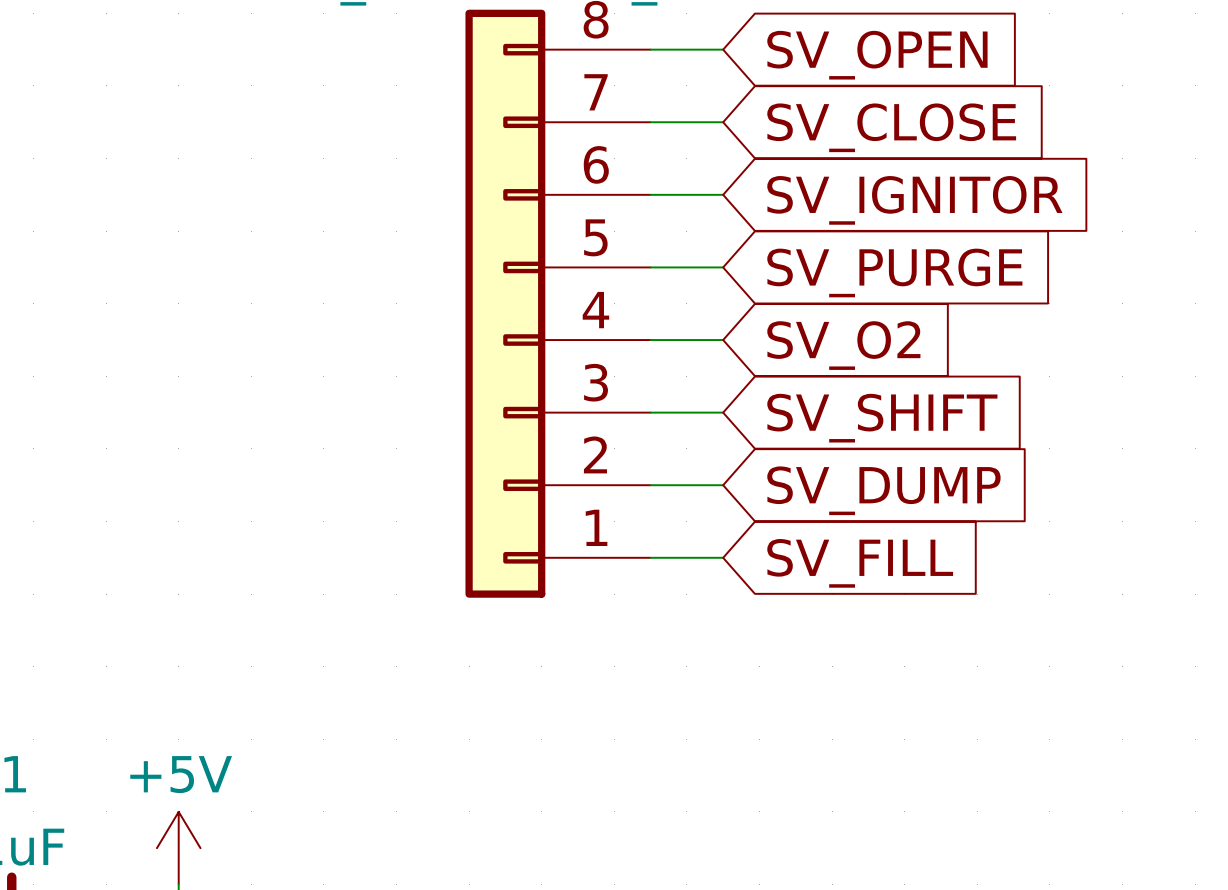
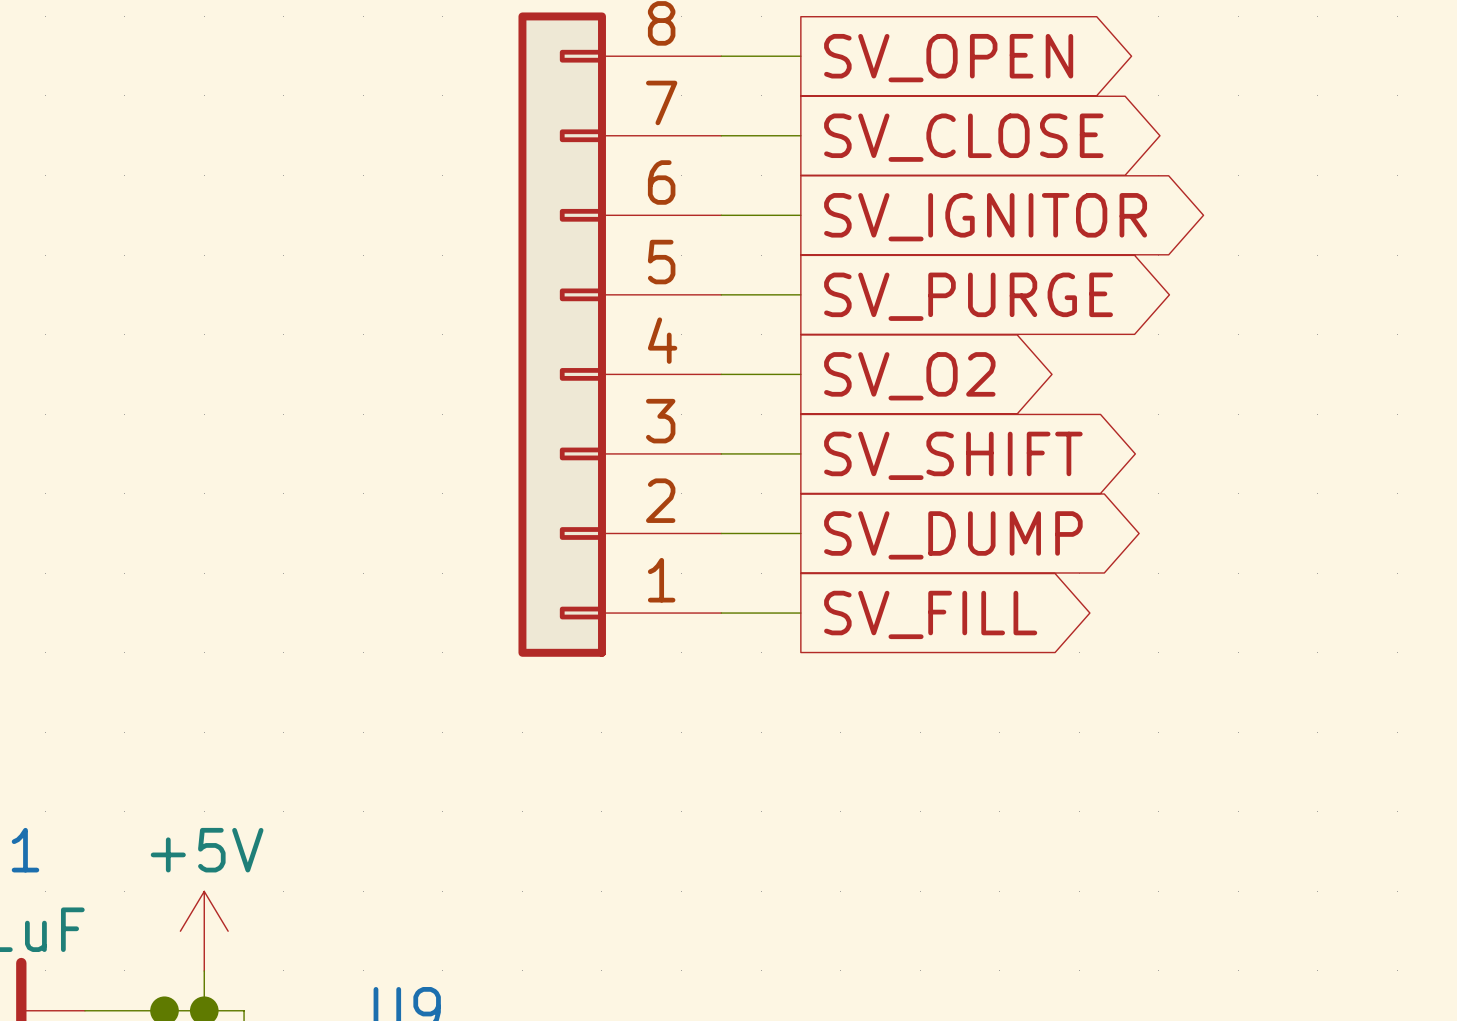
global label shape: input (877, 55) -> output (948, 58)
global label shape: input (891, 127) -> output (963, 137)
global label shape: input (914, 200) -> output (985, 217)
global label shape: input (894, 272) -> output (968, 296)
global label shape: input (843, 345) -> output (909, 376)
global label shape: input (882, 418) -> output (953, 455)
global label shape: input (883, 490) -> output (953, 535)
global label shape: input (860, 563) -> output (930, 614)

